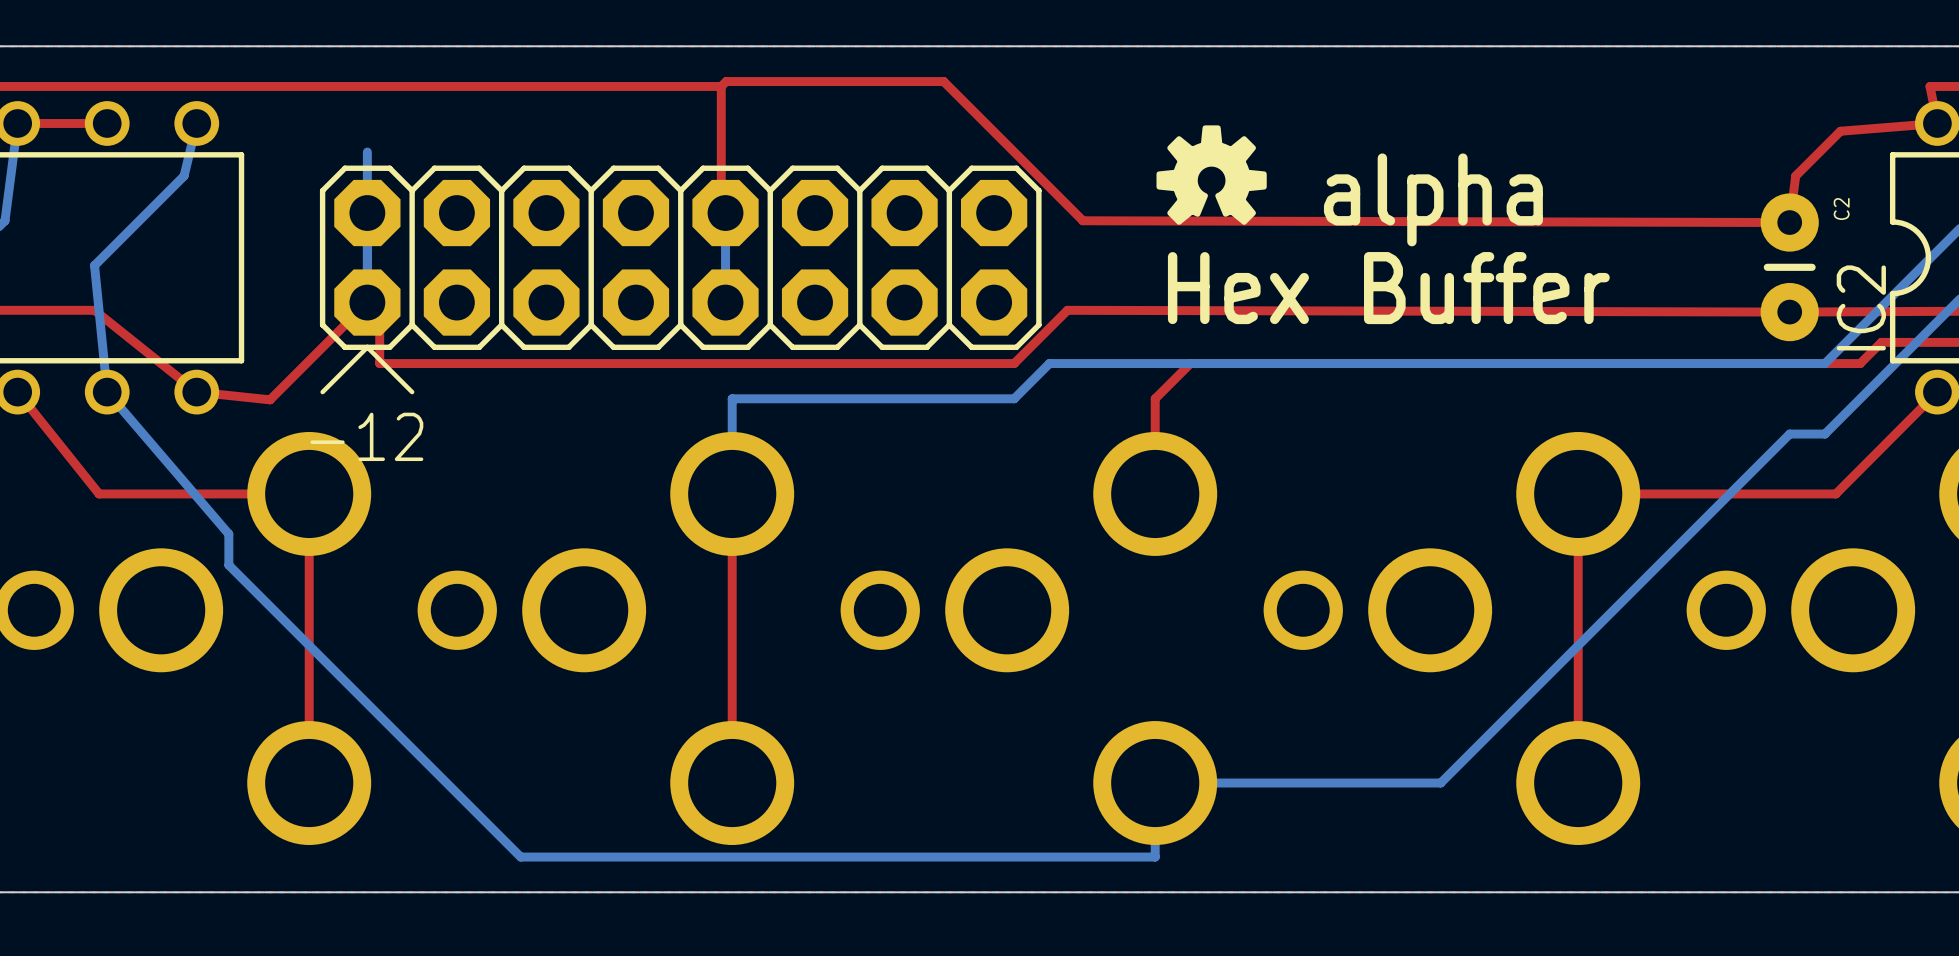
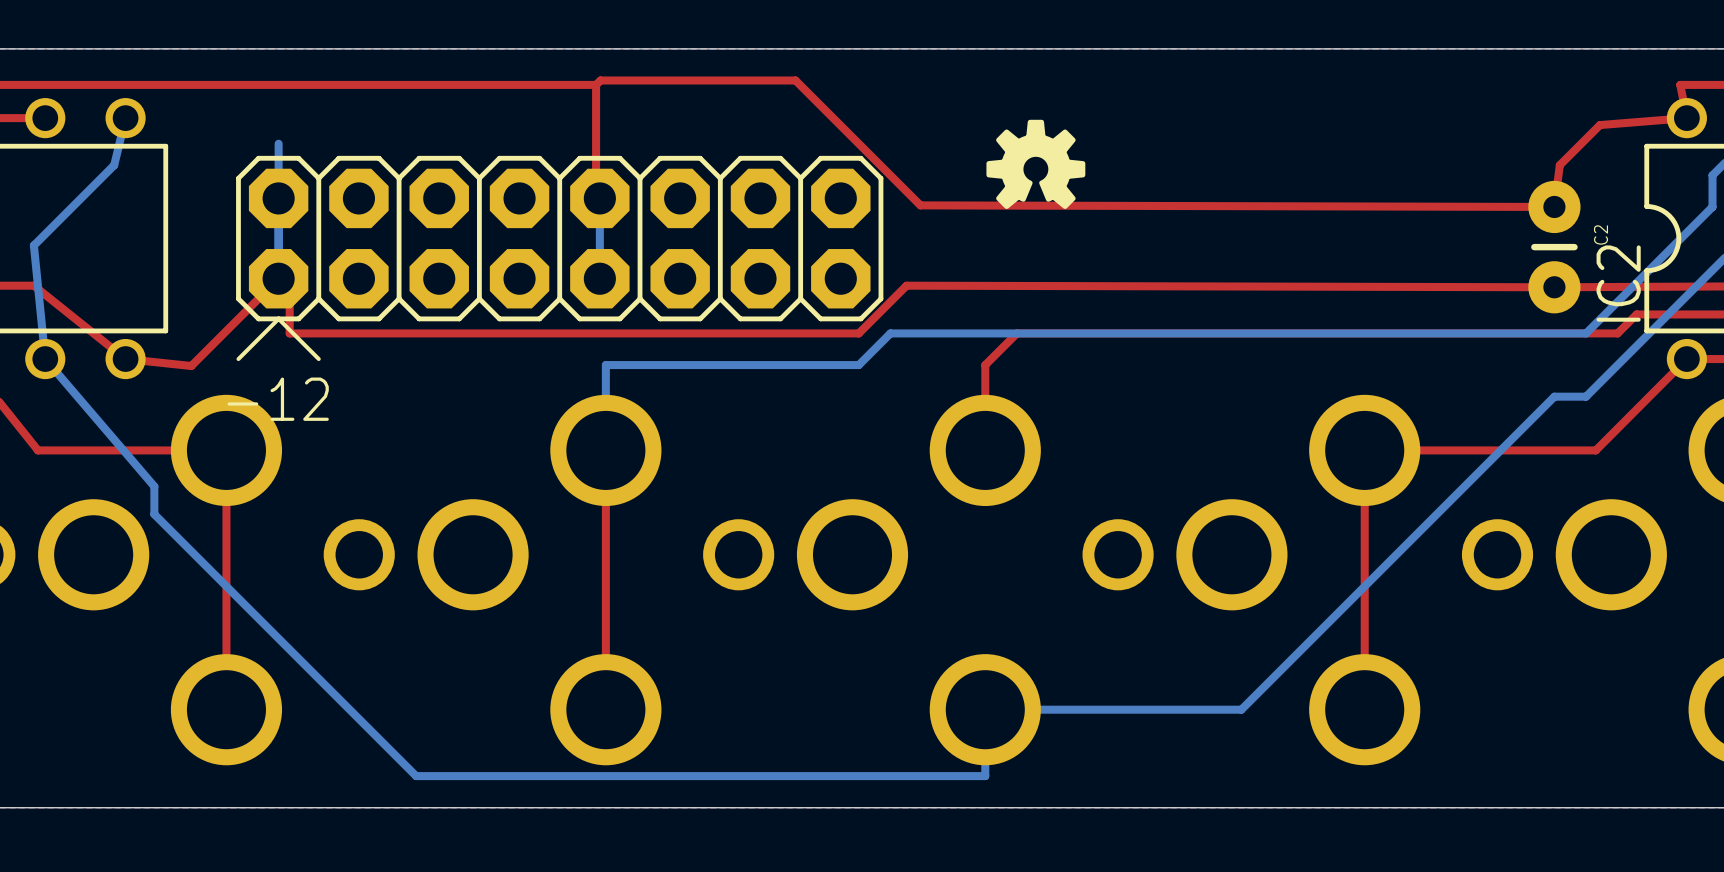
text: alpha (1433, 199) -> none
C2 name position: C2 (1841, 209) -> C2 (1601, 234)
text: Hex Buffer (1388, 288) -> none

